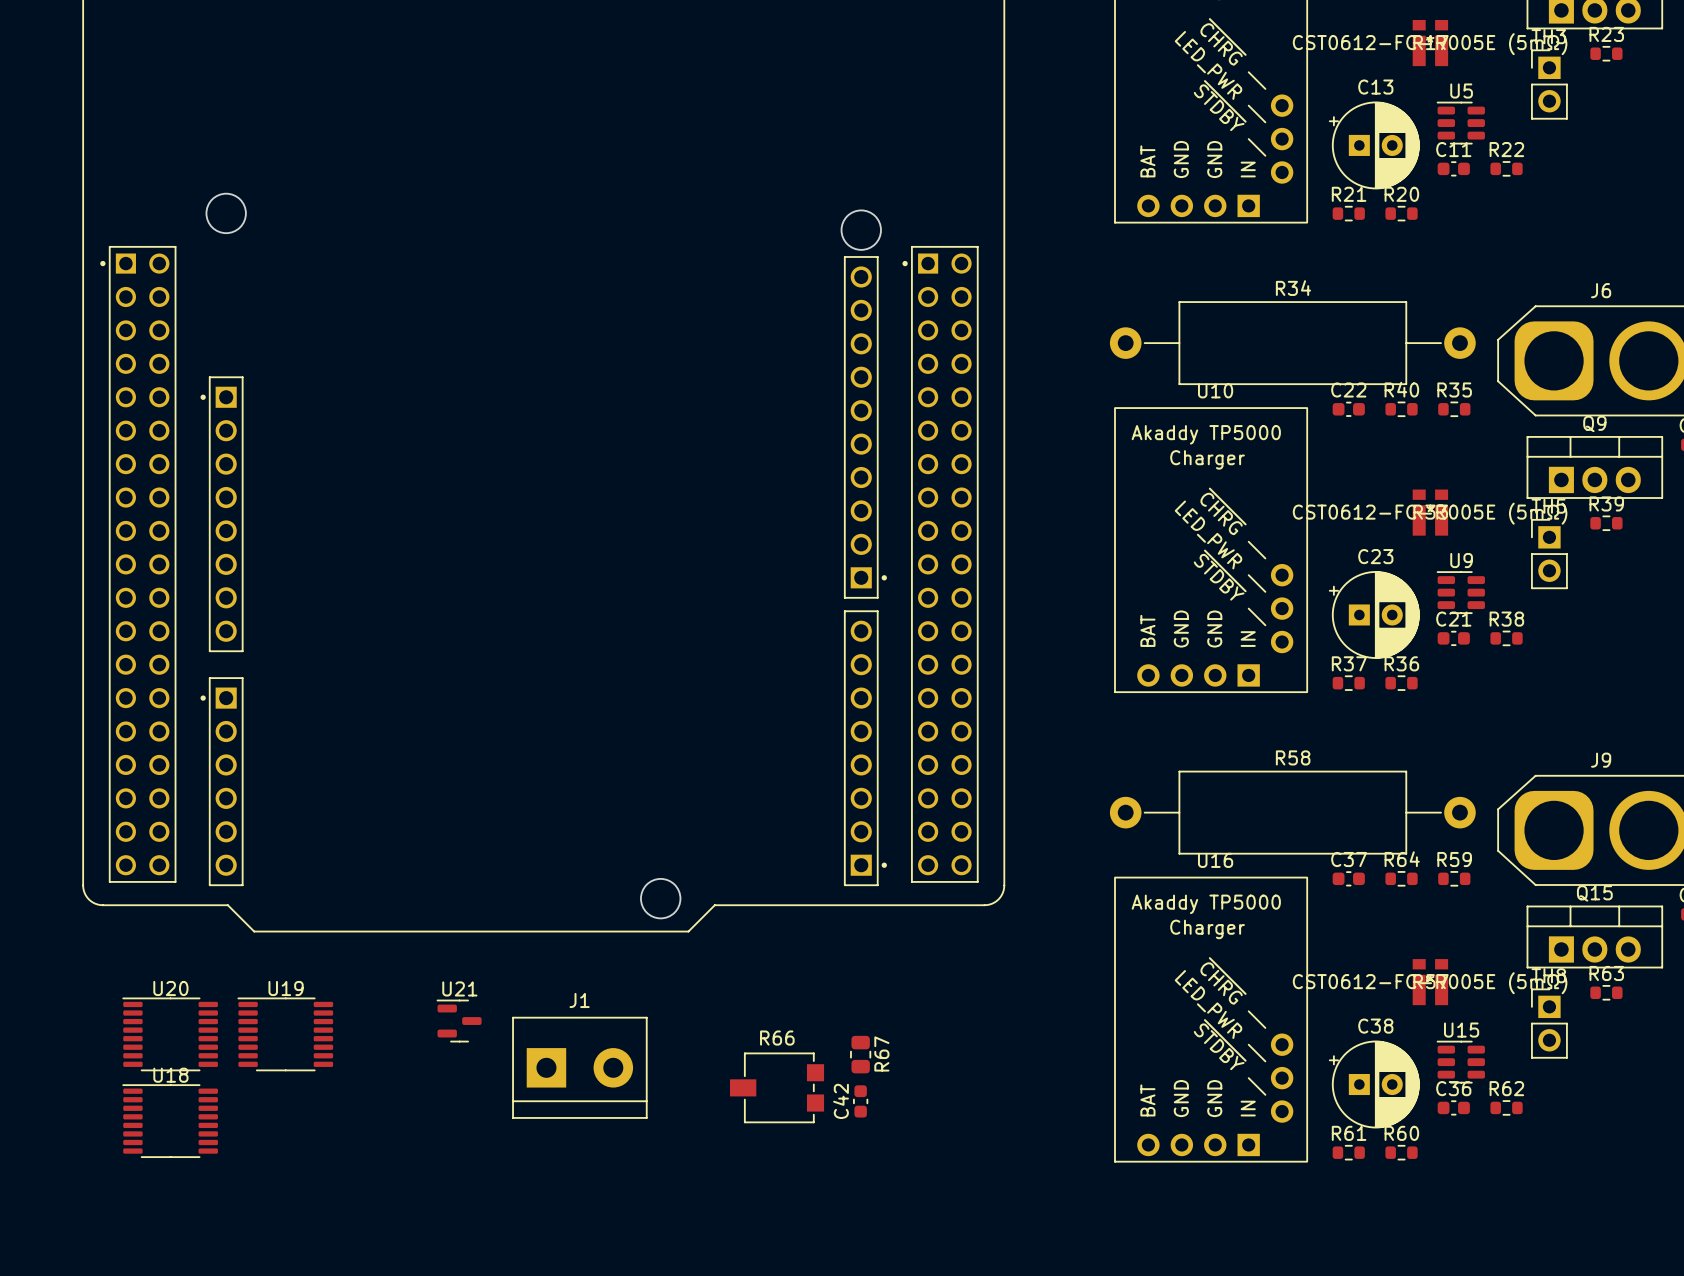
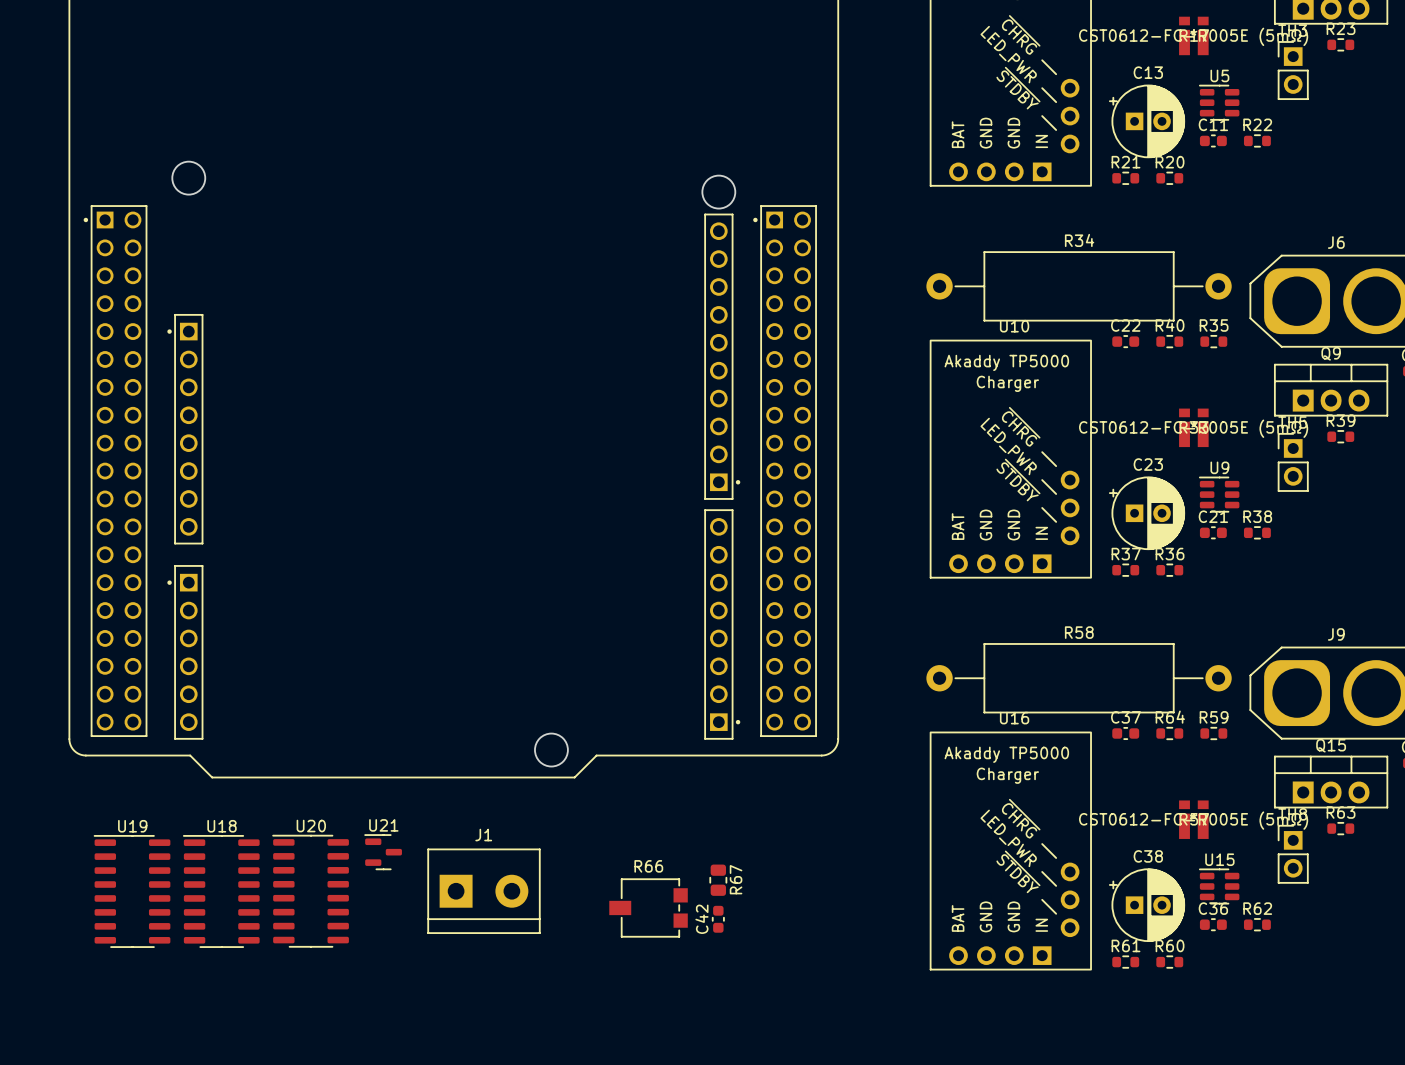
U20 name position: U20 (170, 988) -> U20 (311, 826)
U19 name position: U19 (286, 988) -> U19 (132, 826)
U20 footprint: [122, 997, 218, 1072] -> [272, 835, 349, 948]
U19 footprint: [237, 997, 334, 1072] -> [93, 835, 171, 948]
U18 name position: U18 (170, 1075) -> U18 (222, 826)
U18 footprint: [122, 1084, 218, 1158] -> [183, 835, 260, 948]

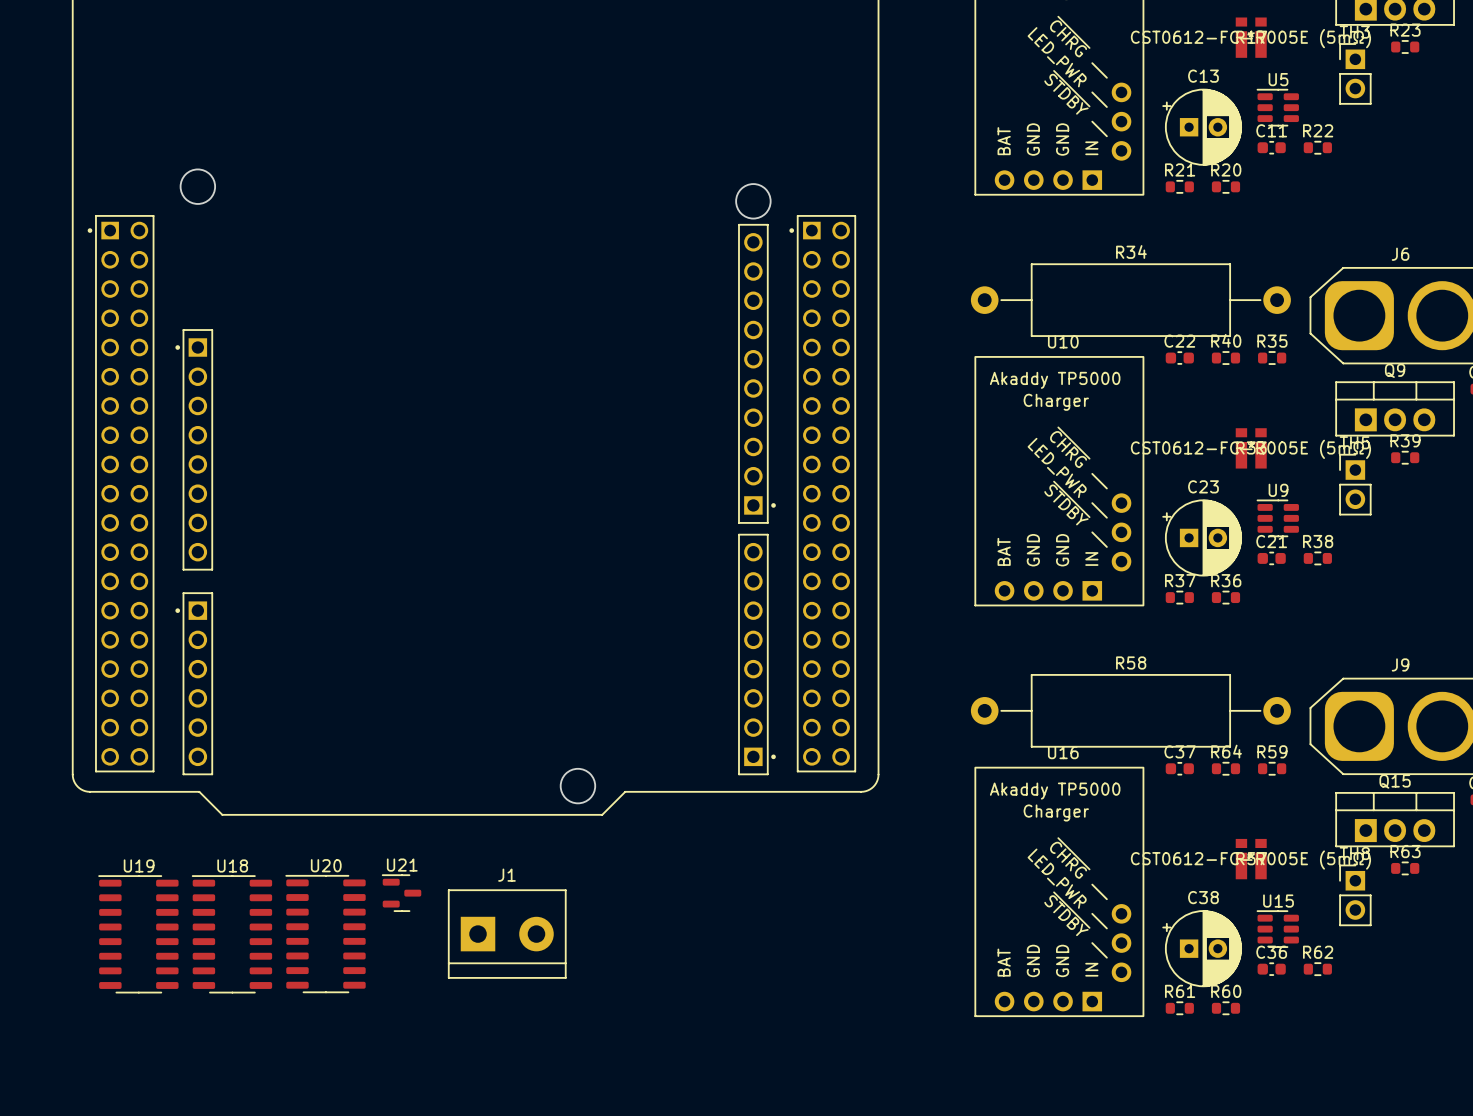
R67: (718, 880) -> none
R66: (648, 907) -> none
C42: (718, 919) -> none

